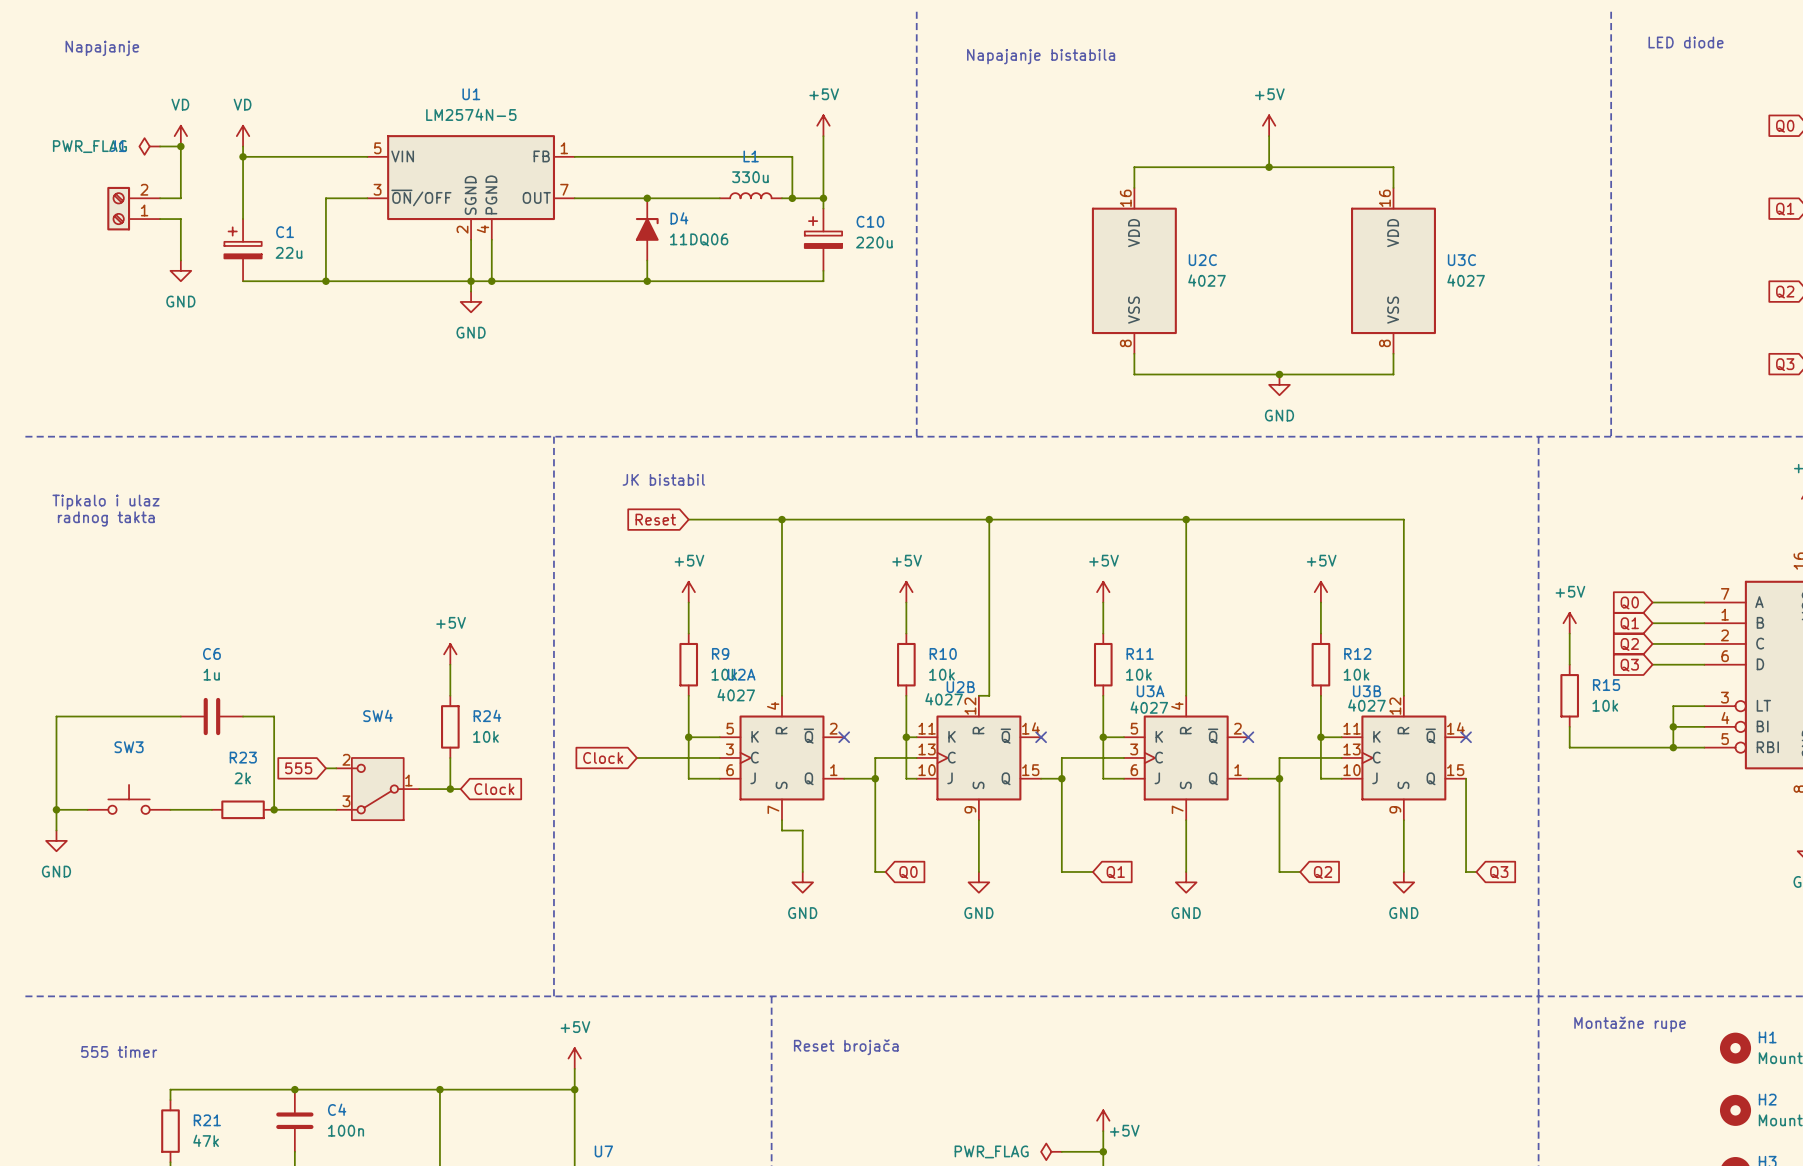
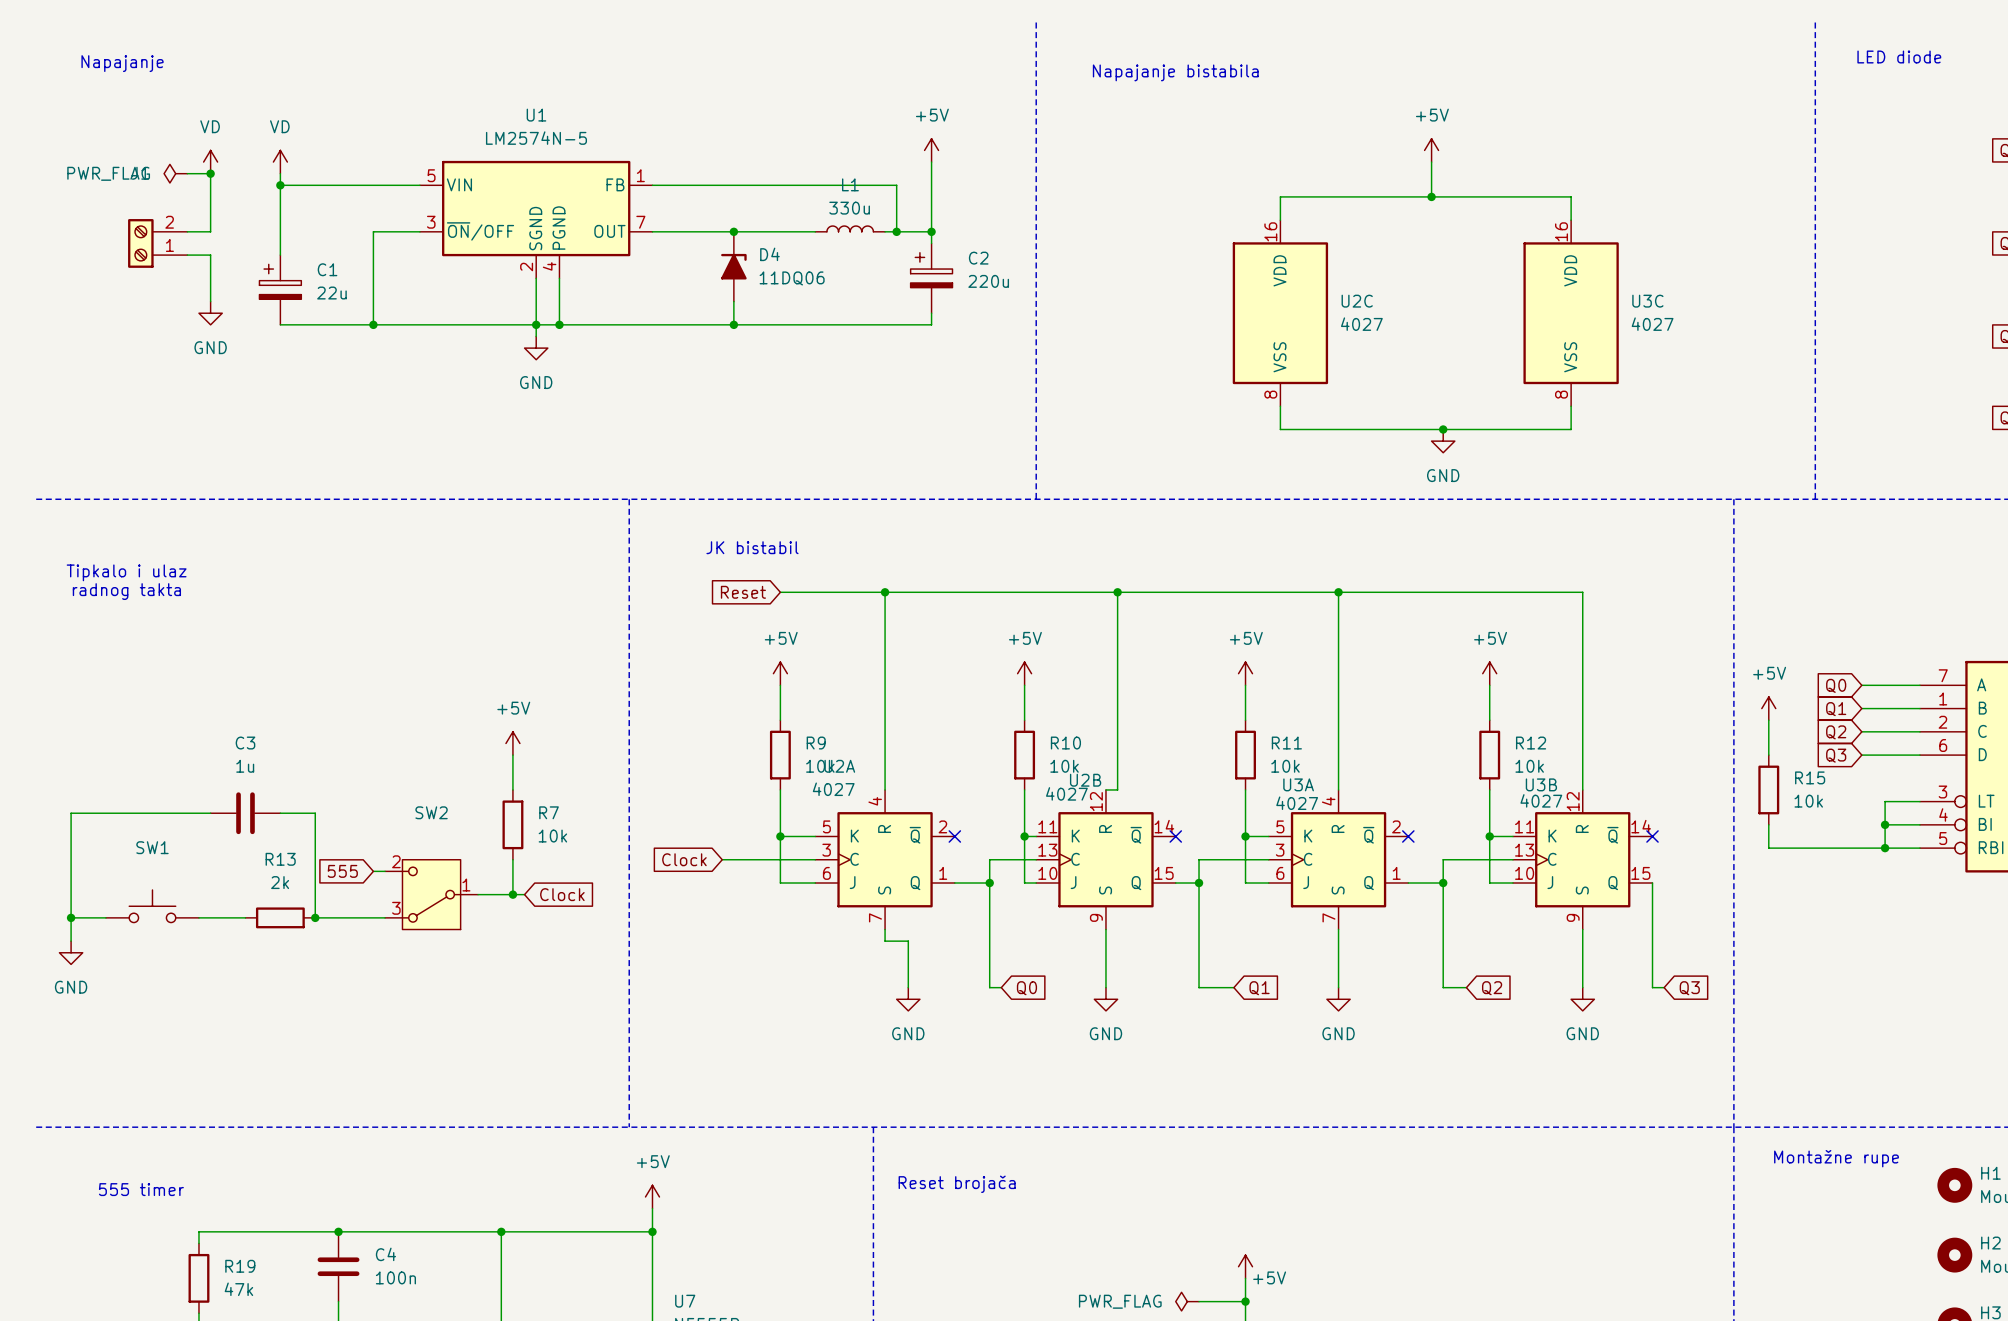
C10 name: C10 (870, 221) -> C2 (978, 258)
C6 name: C6 (211, 653) -> C3 (245, 743)
SW4 name: SW4 (378, 715) -> SW2 (431, 812)
R24 name: R24 (487, 715) -> R7 (549, 812)
SW3 name: SW3 (129, 747) -> SW1 (152, 847)
R23 name: R23 (243, 757) -> R13 (280, 859)
R21 name: R21 (207, 1120) -> R19 (240, 1266)

